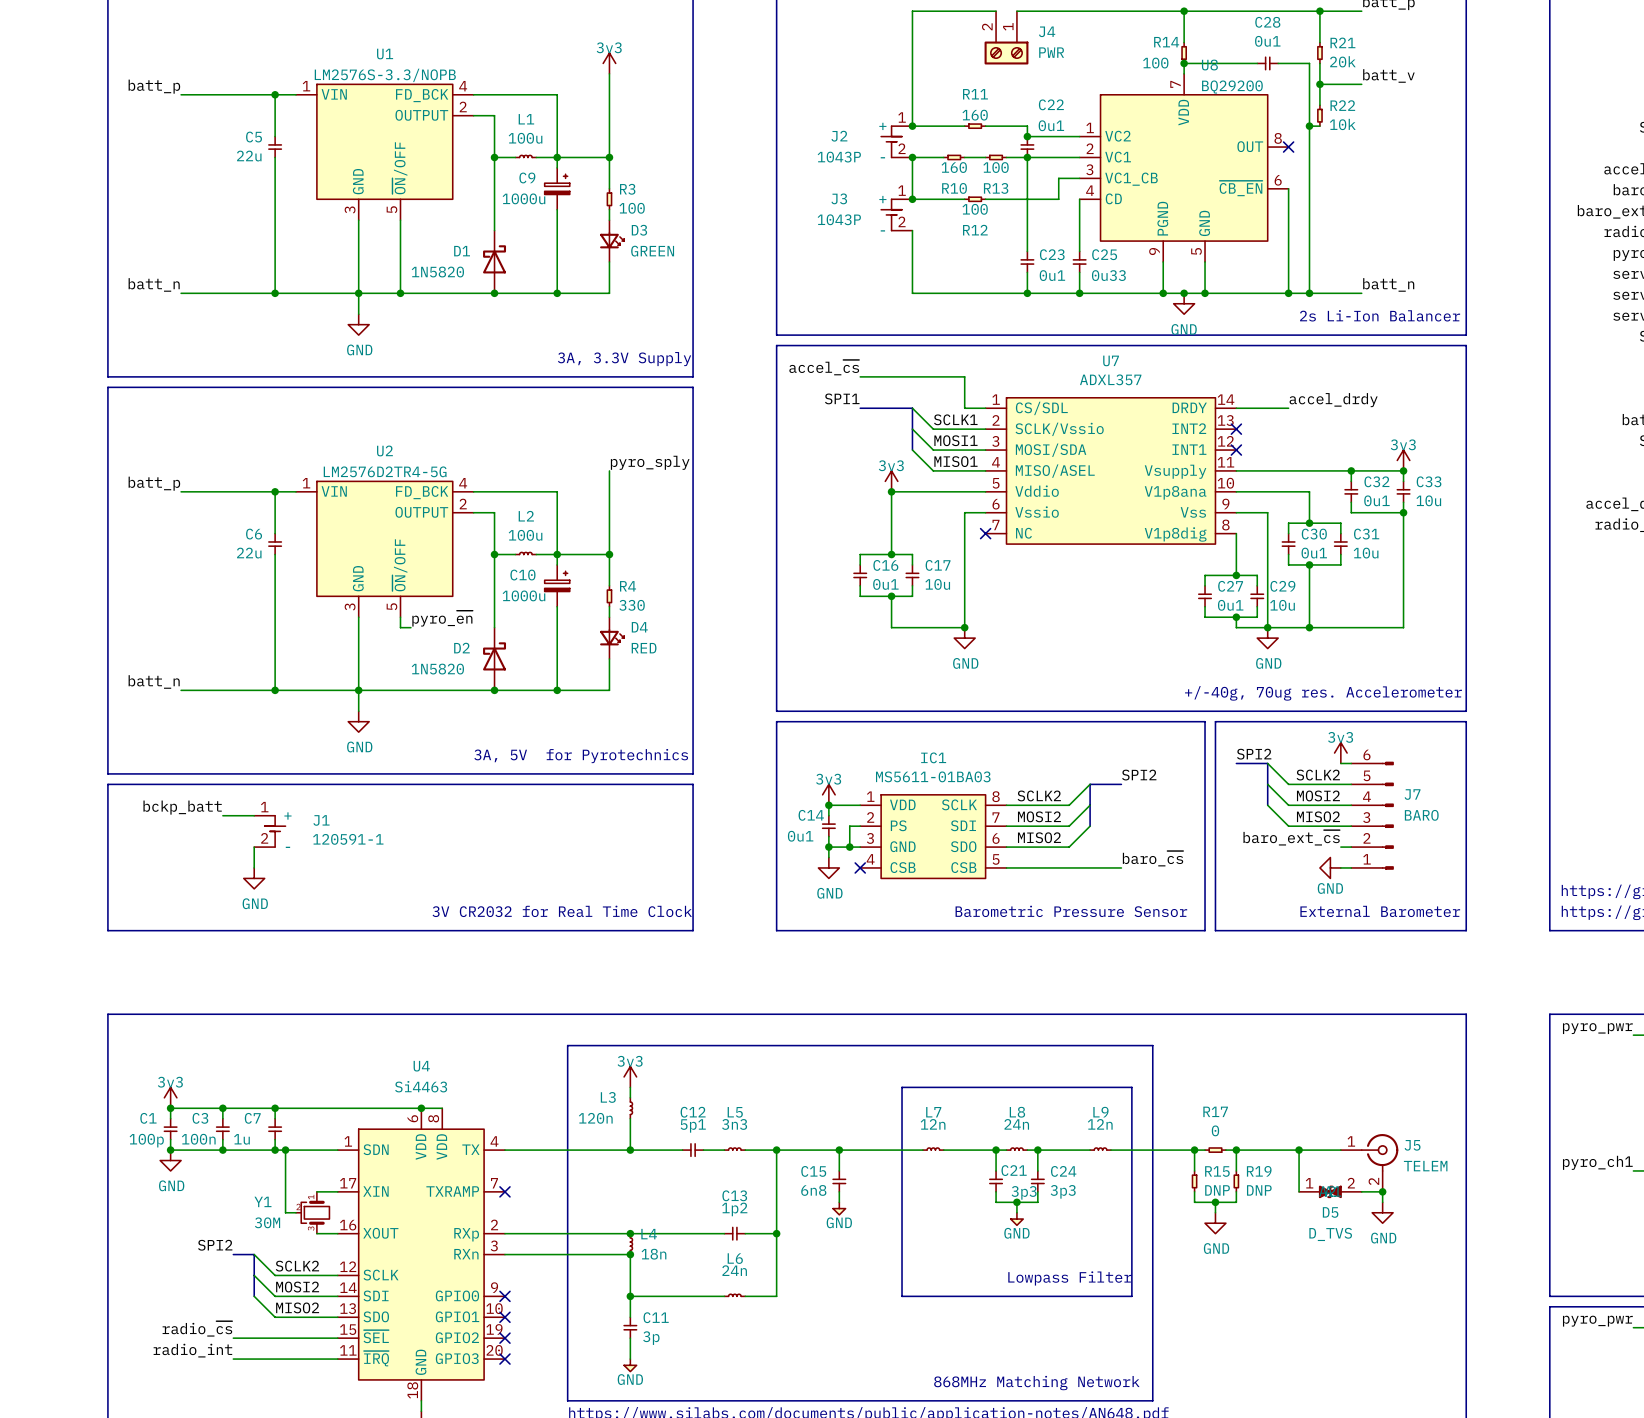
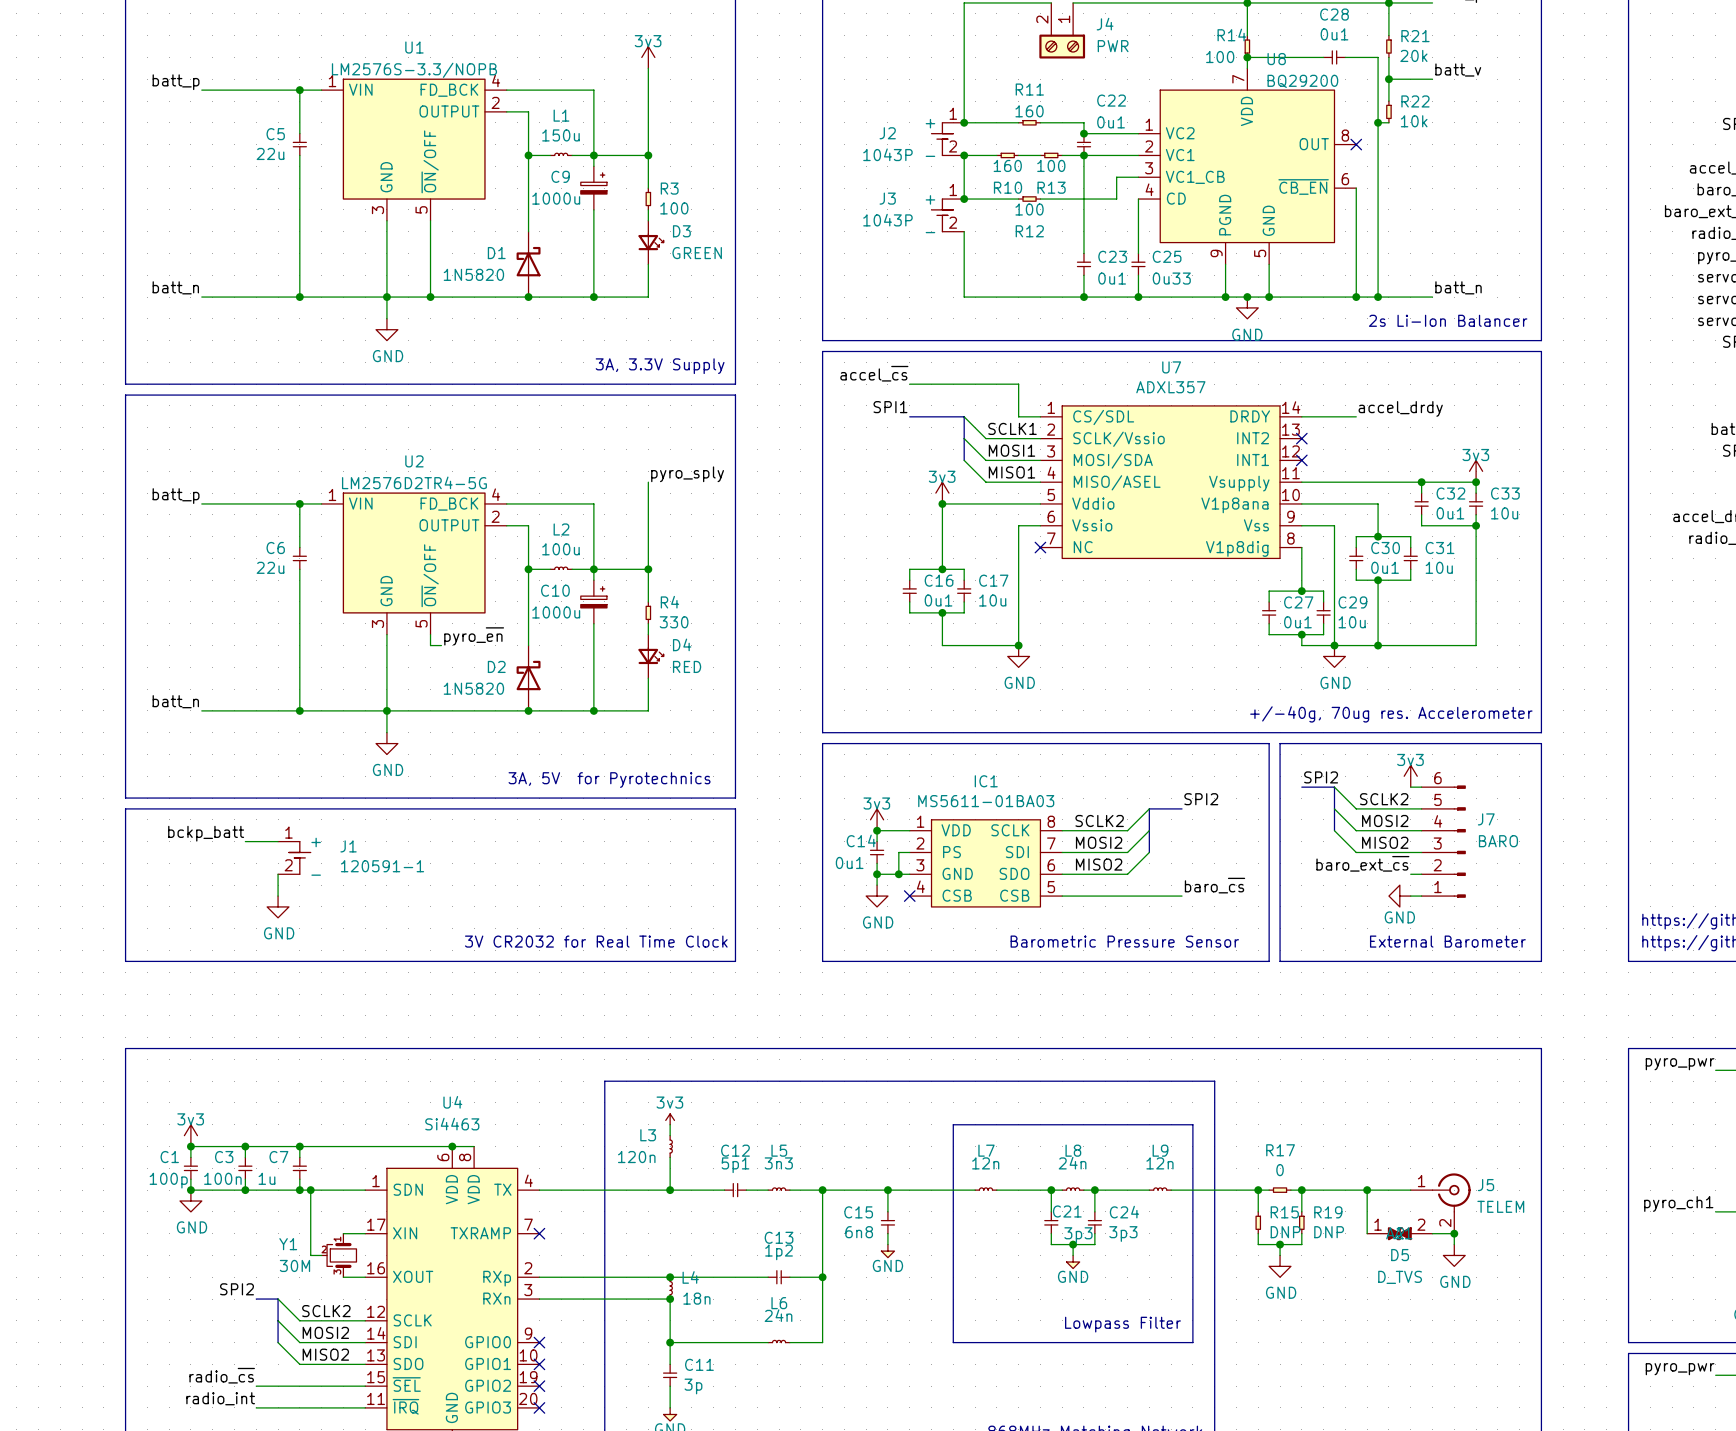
L1 value: 100u (525, 138) -> 150u (560, 135)
power symbol shape: [624, 1066, 637, 1088] -> [665, 1113, 675, 1125]

